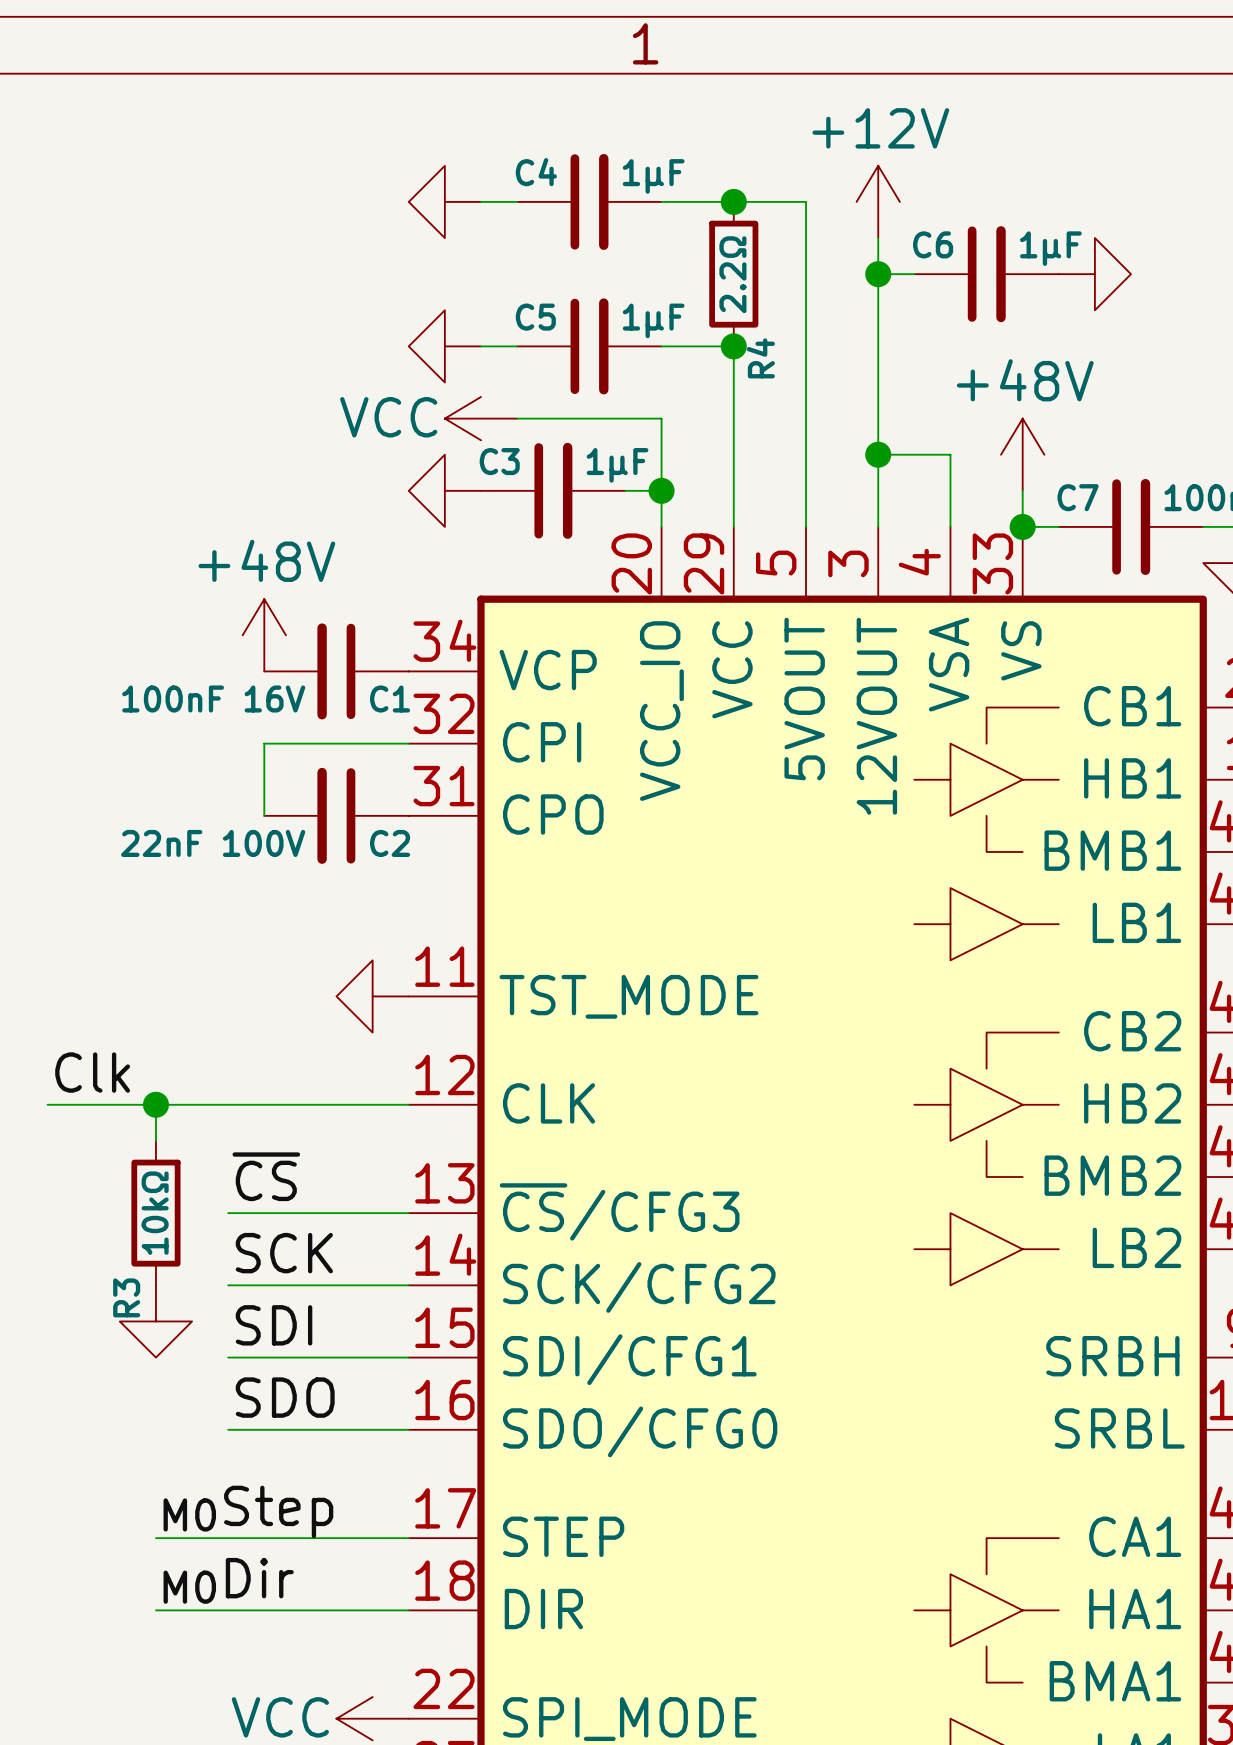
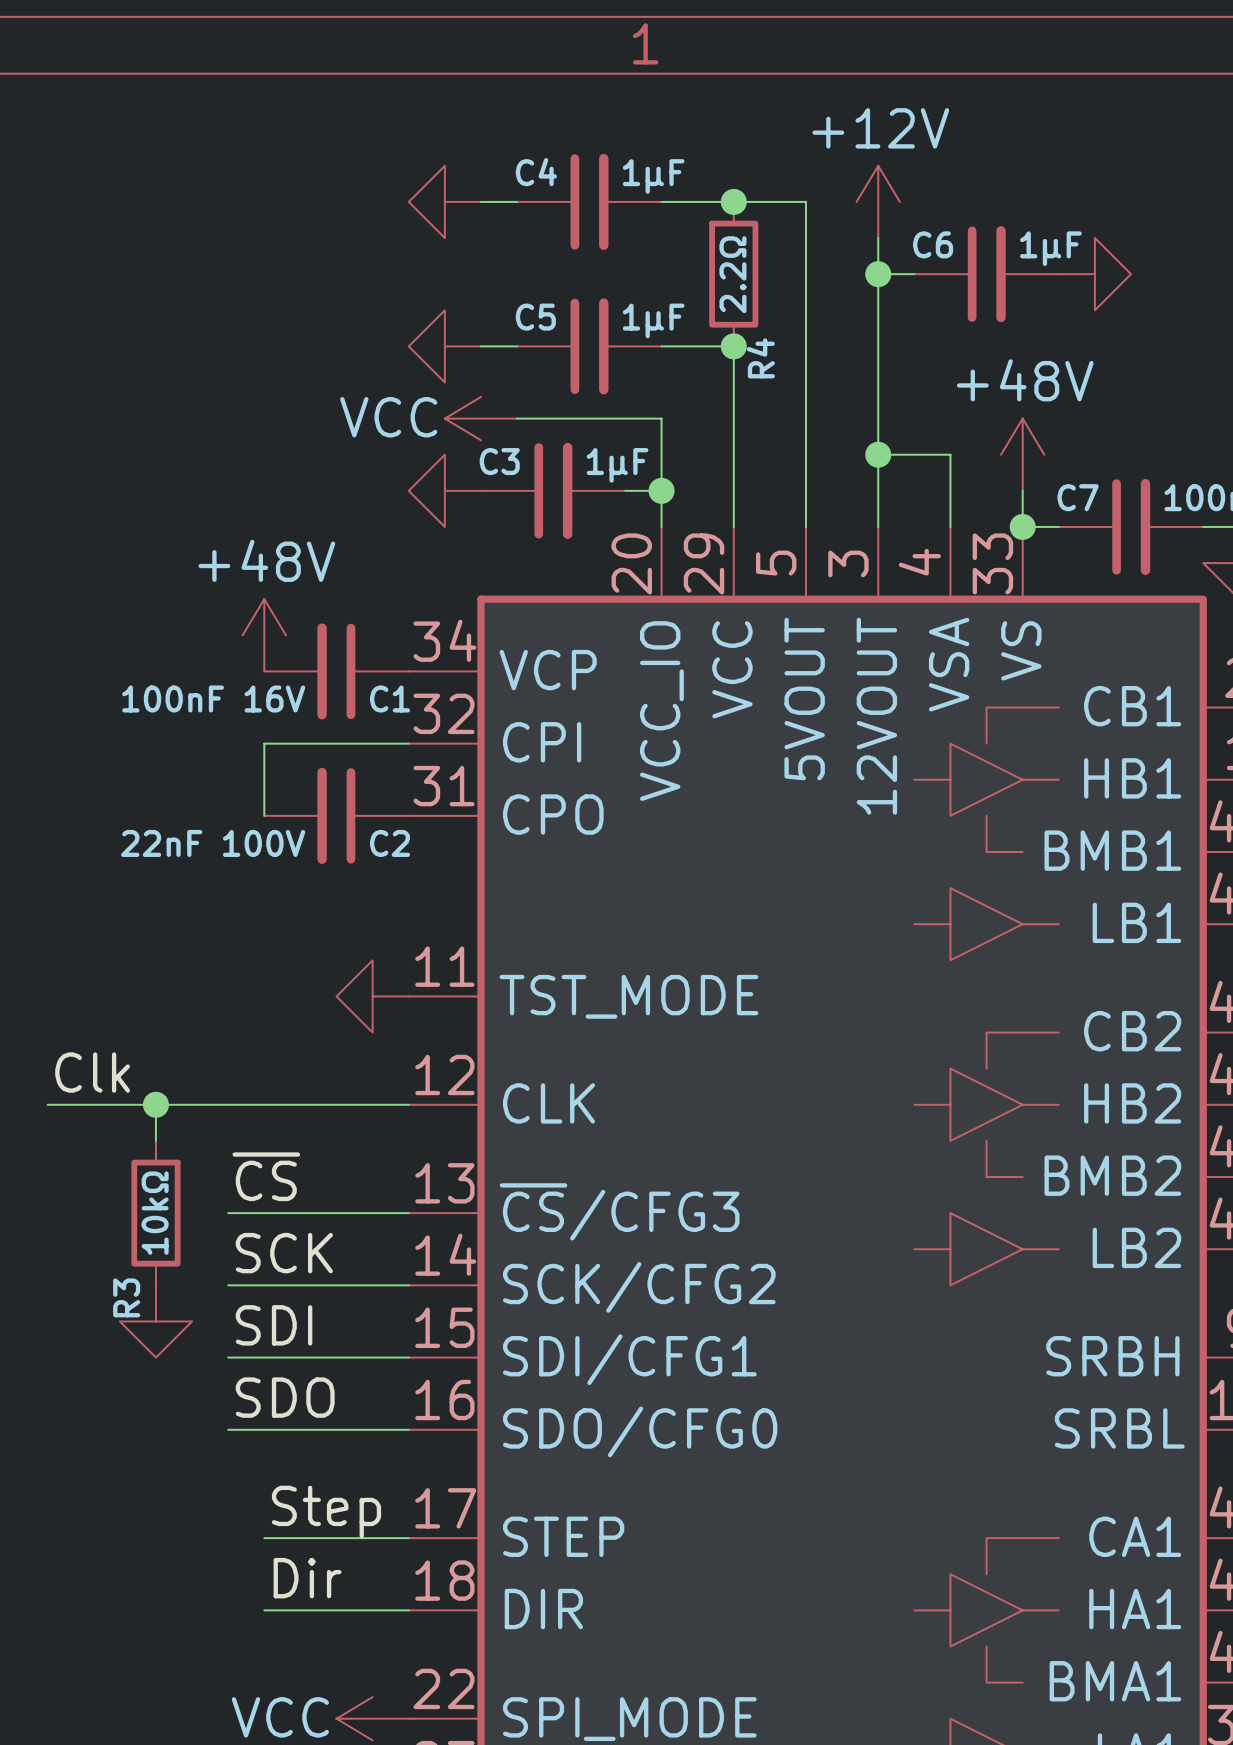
label: M0Step (248, 1511) -> Step (326, 1511)
wire: (155, 1538) (264, 1538) -> none
label: none -> Dir (307, 1578)
label: M0Dir (228, 1580) -> none
wire: (155, 1610) (264, 1610) -> none

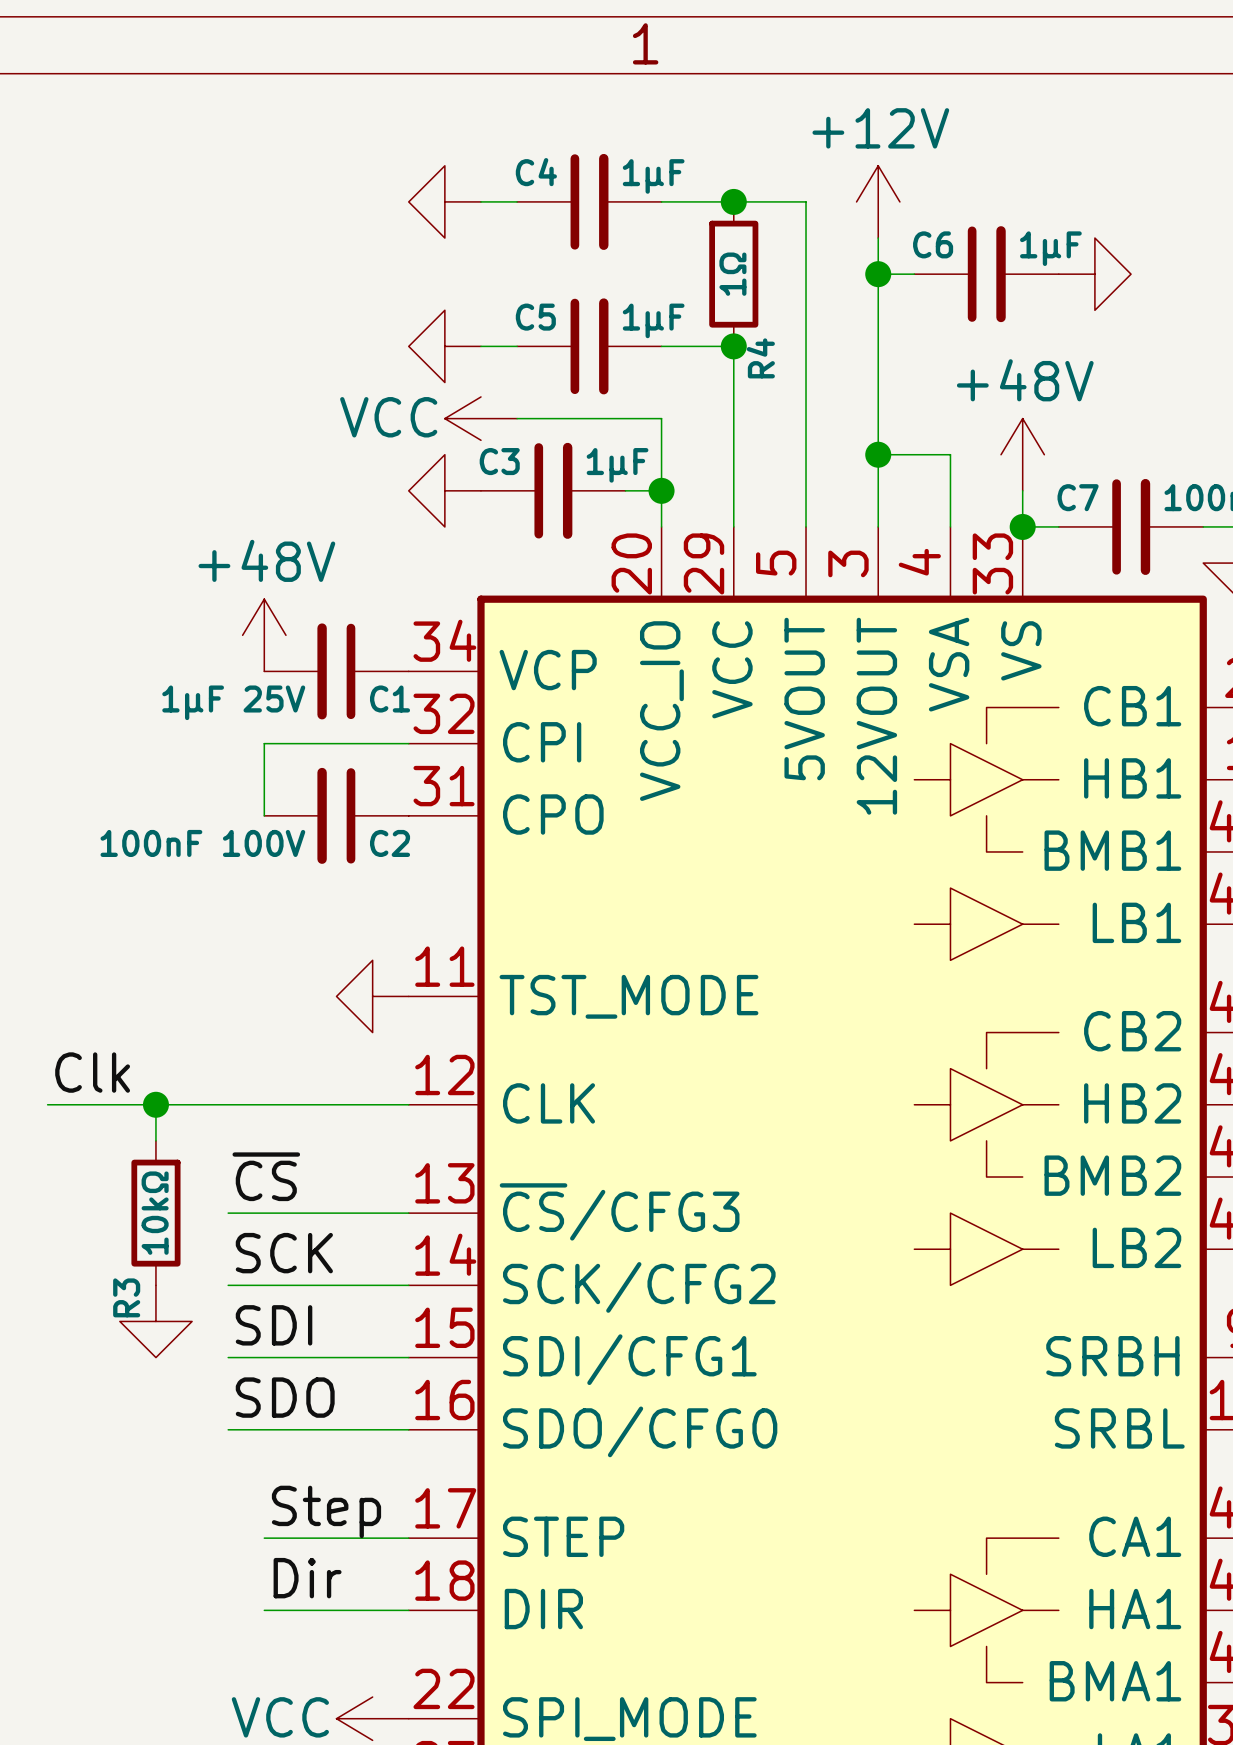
R4 value: 2.2Ω (732, 274) -> 1Ω (732, 274)
C1 value: 100nF 16V (213, 699) -> 1μF 25V (233, 702)
C2 value: 22nF 100V (213, 843) -> 100nF 100V (202, 843)

